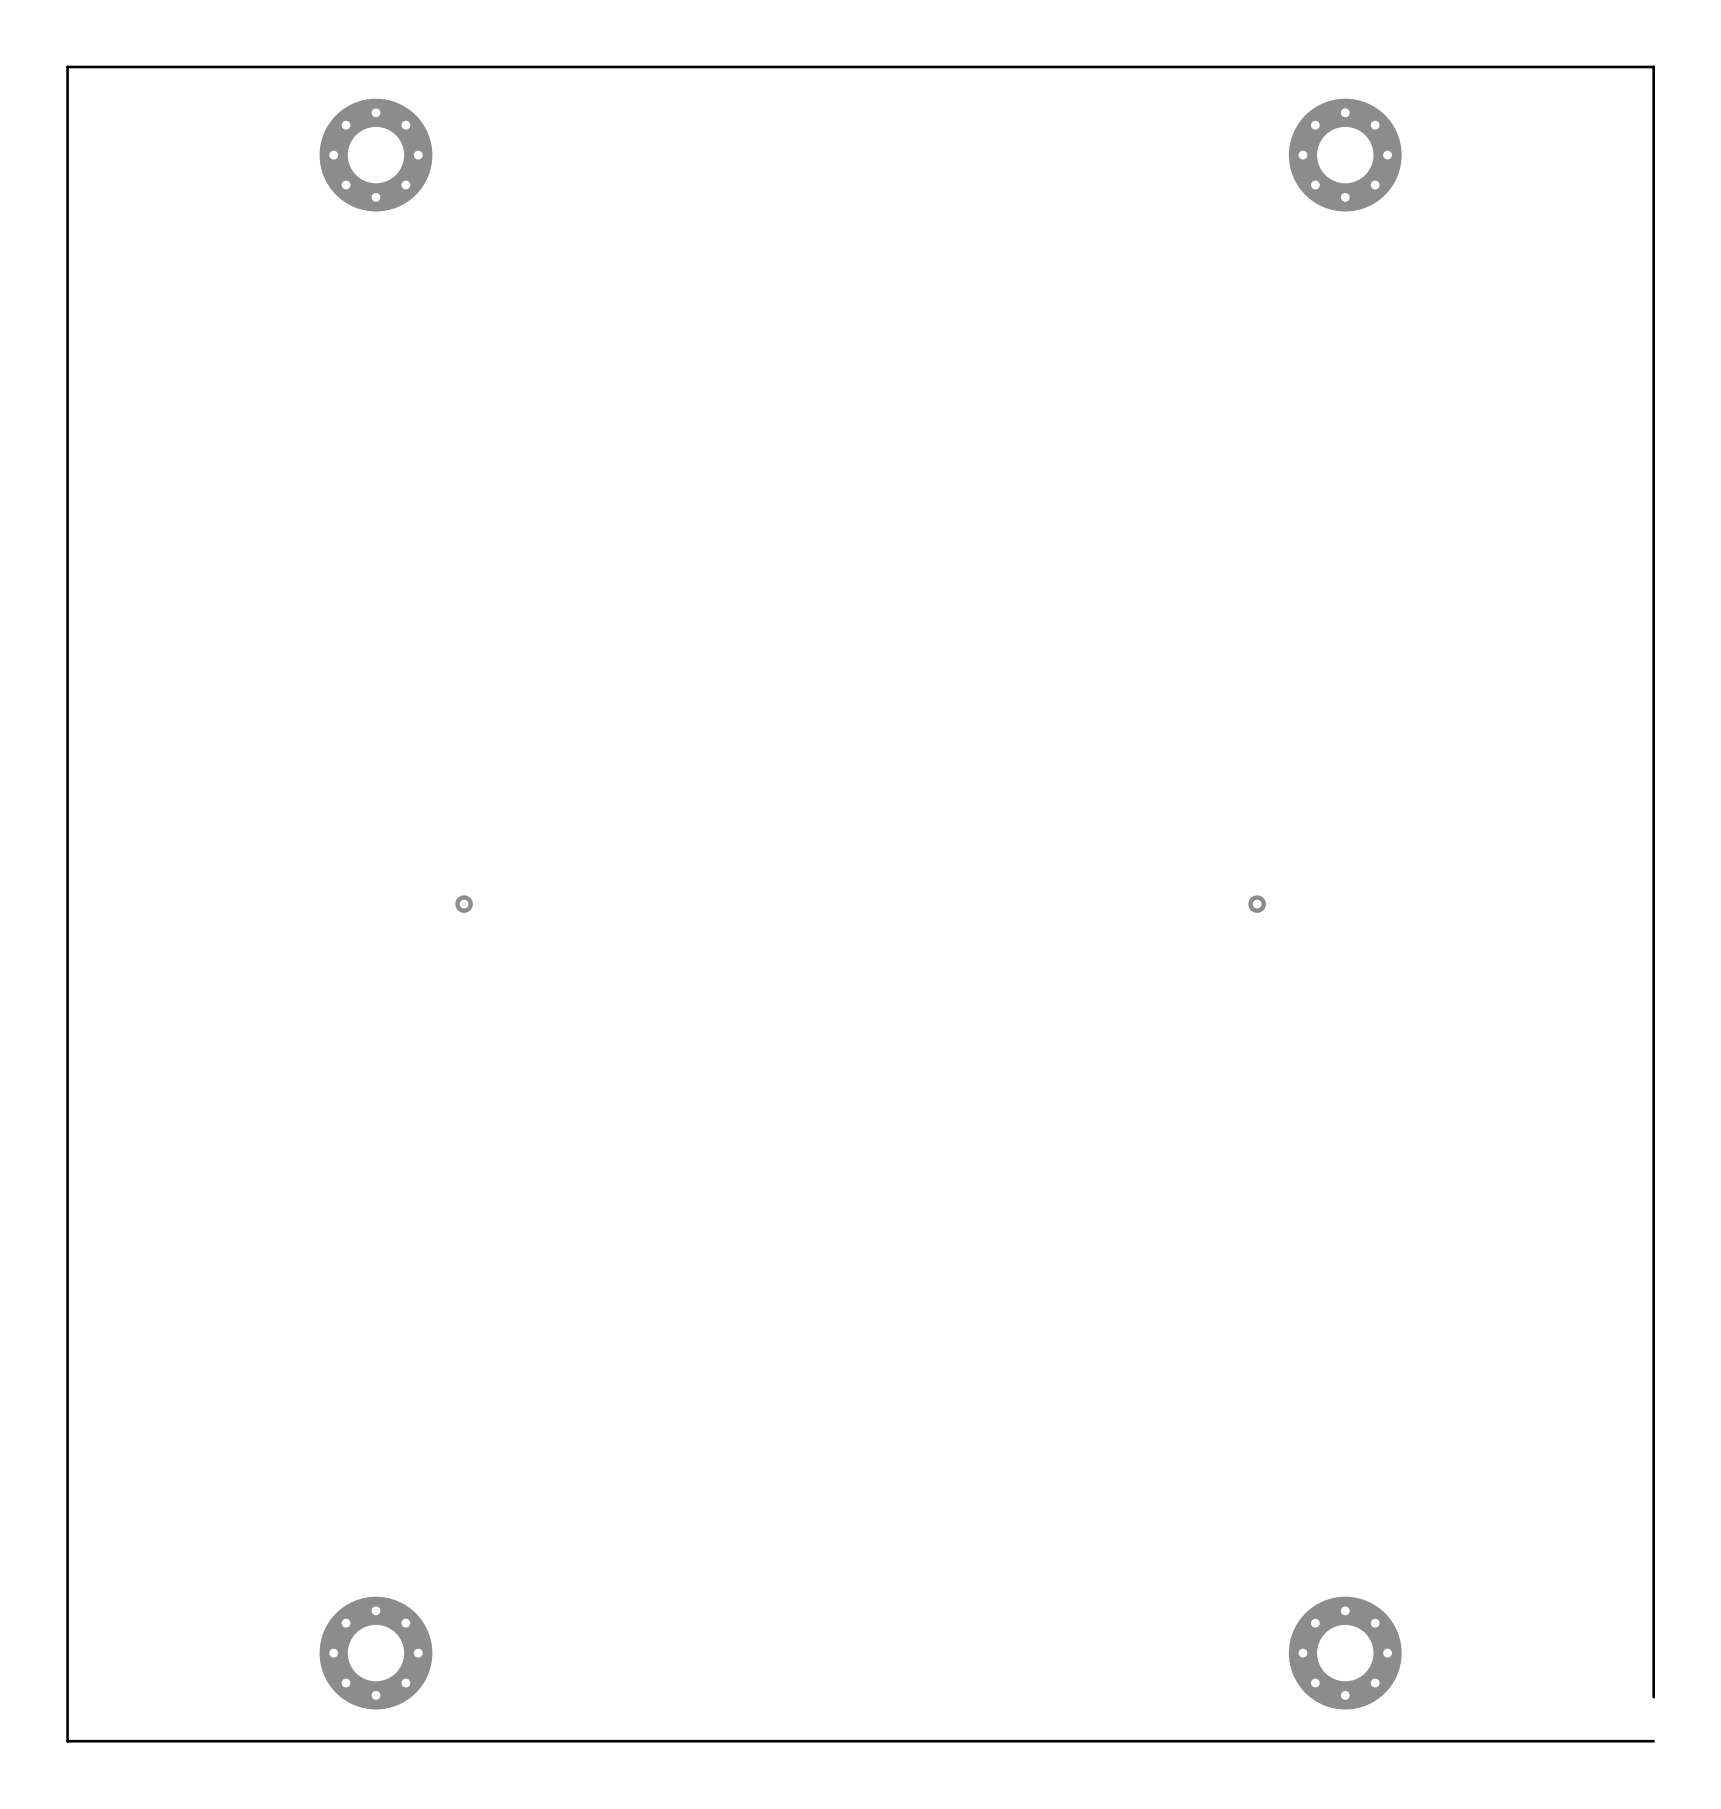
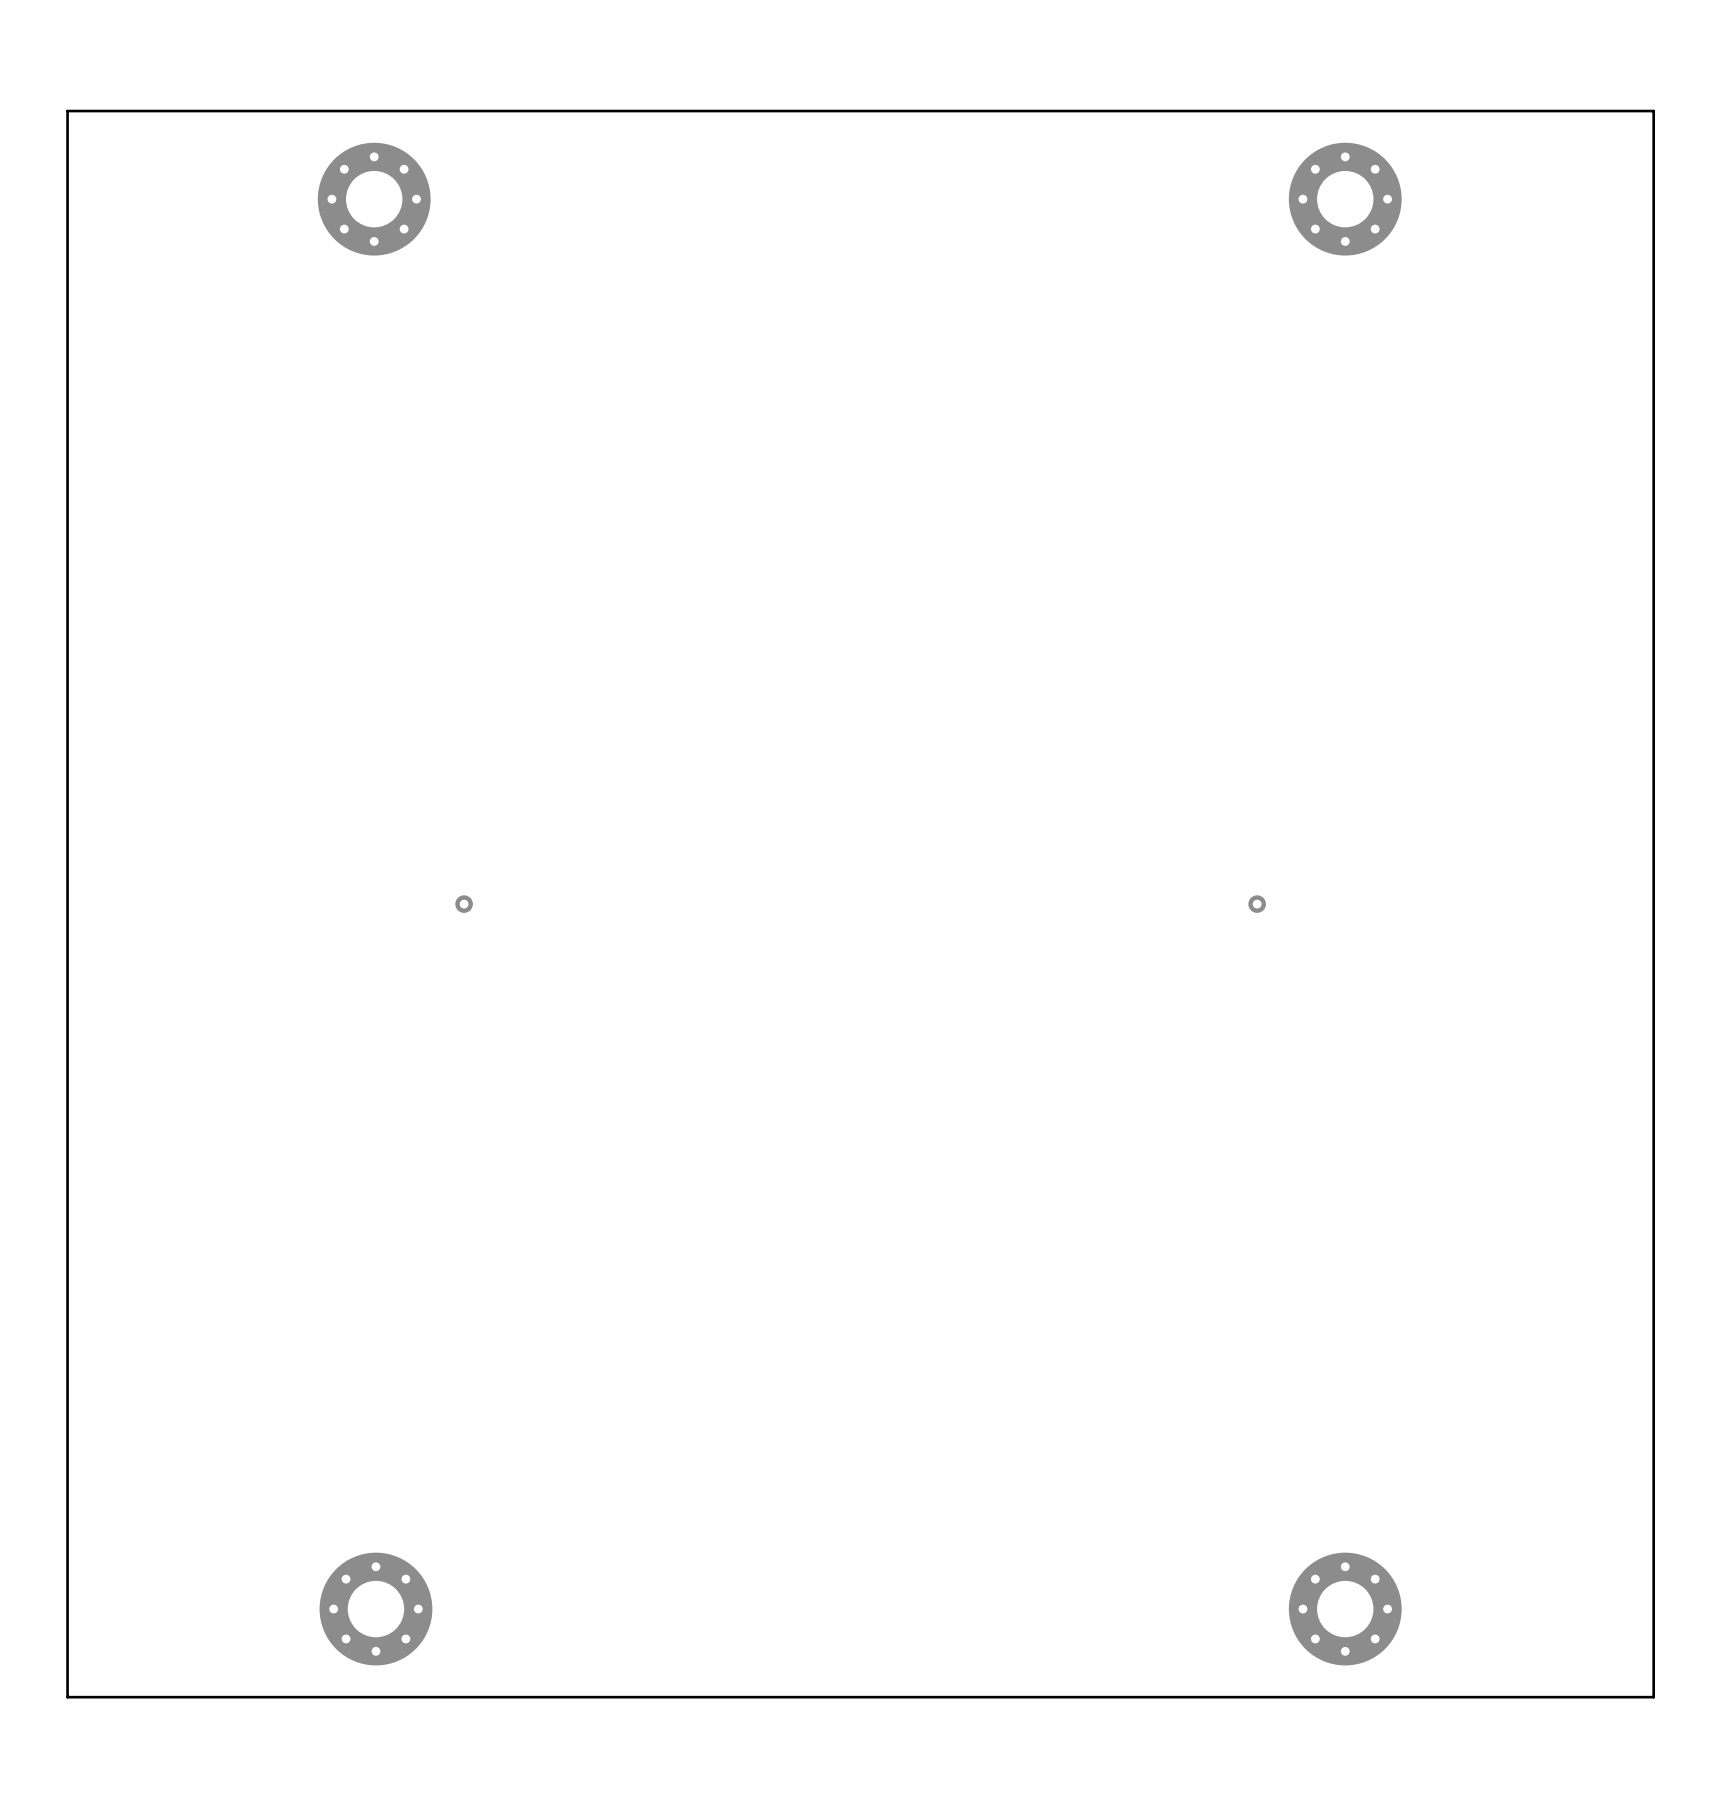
board edge: (1653, 111) (1653, 66) (67, 66) (67, 111) -> (1653, 111) (67, 111)
part position: (375, 155) -> (374, 199)
part position: (1345, 155) -> (1345, 199)
part position: (375, 1653) -> (375, 1609)
part position: (1345, 1653) -> (1345, 1609)
board edge: (67, 1697) (67, 1741) (1653, 1741) -> (67, 1697) (1653, 1697)

